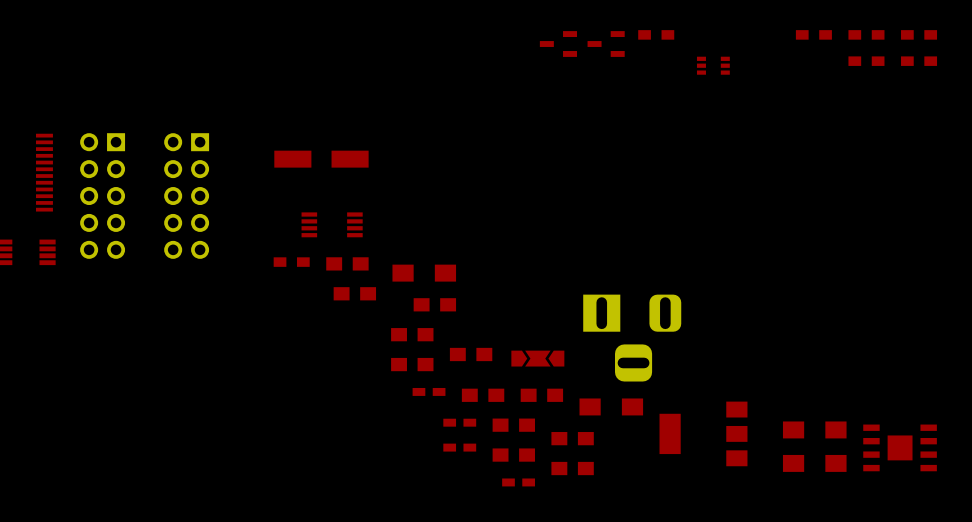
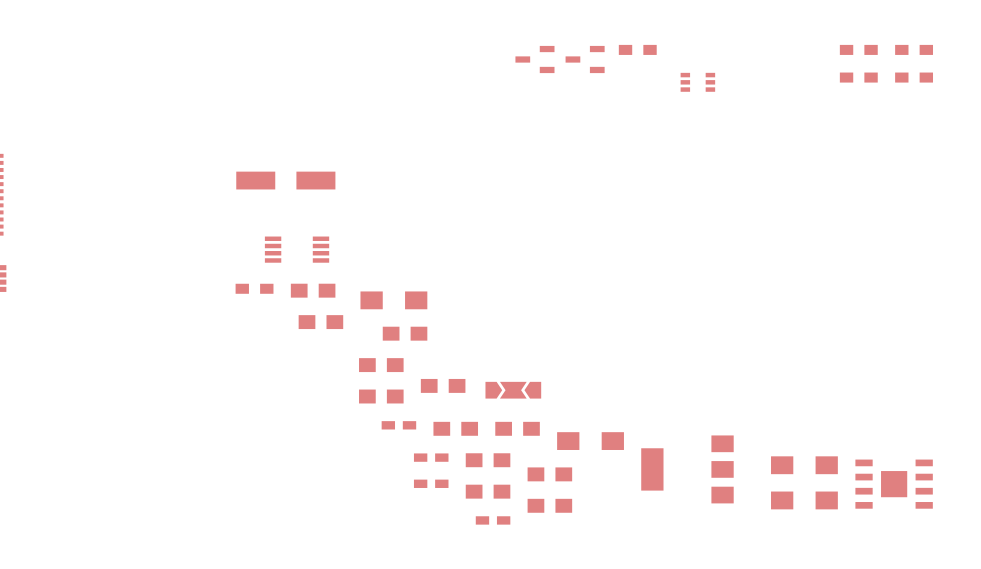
part: (813, 34) -> none
part: (102, 196) -> none
part: (186, 196) -> none
part: (632, 338) -> none

